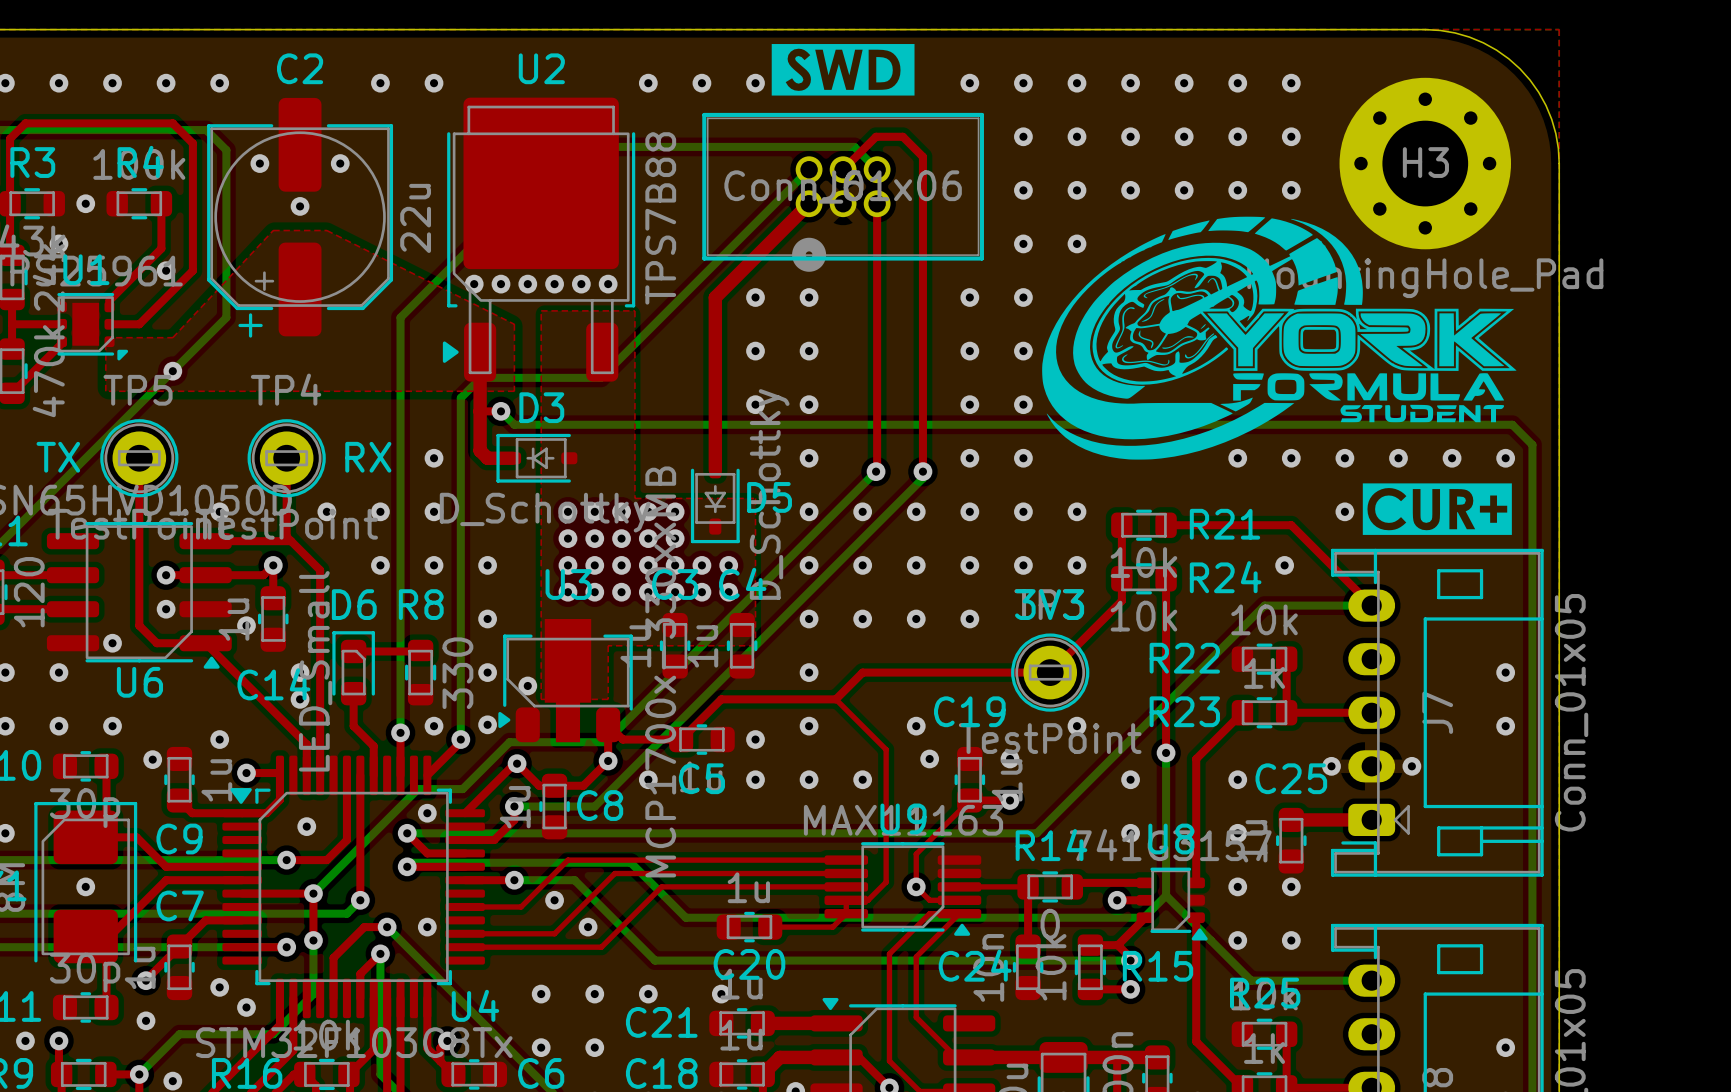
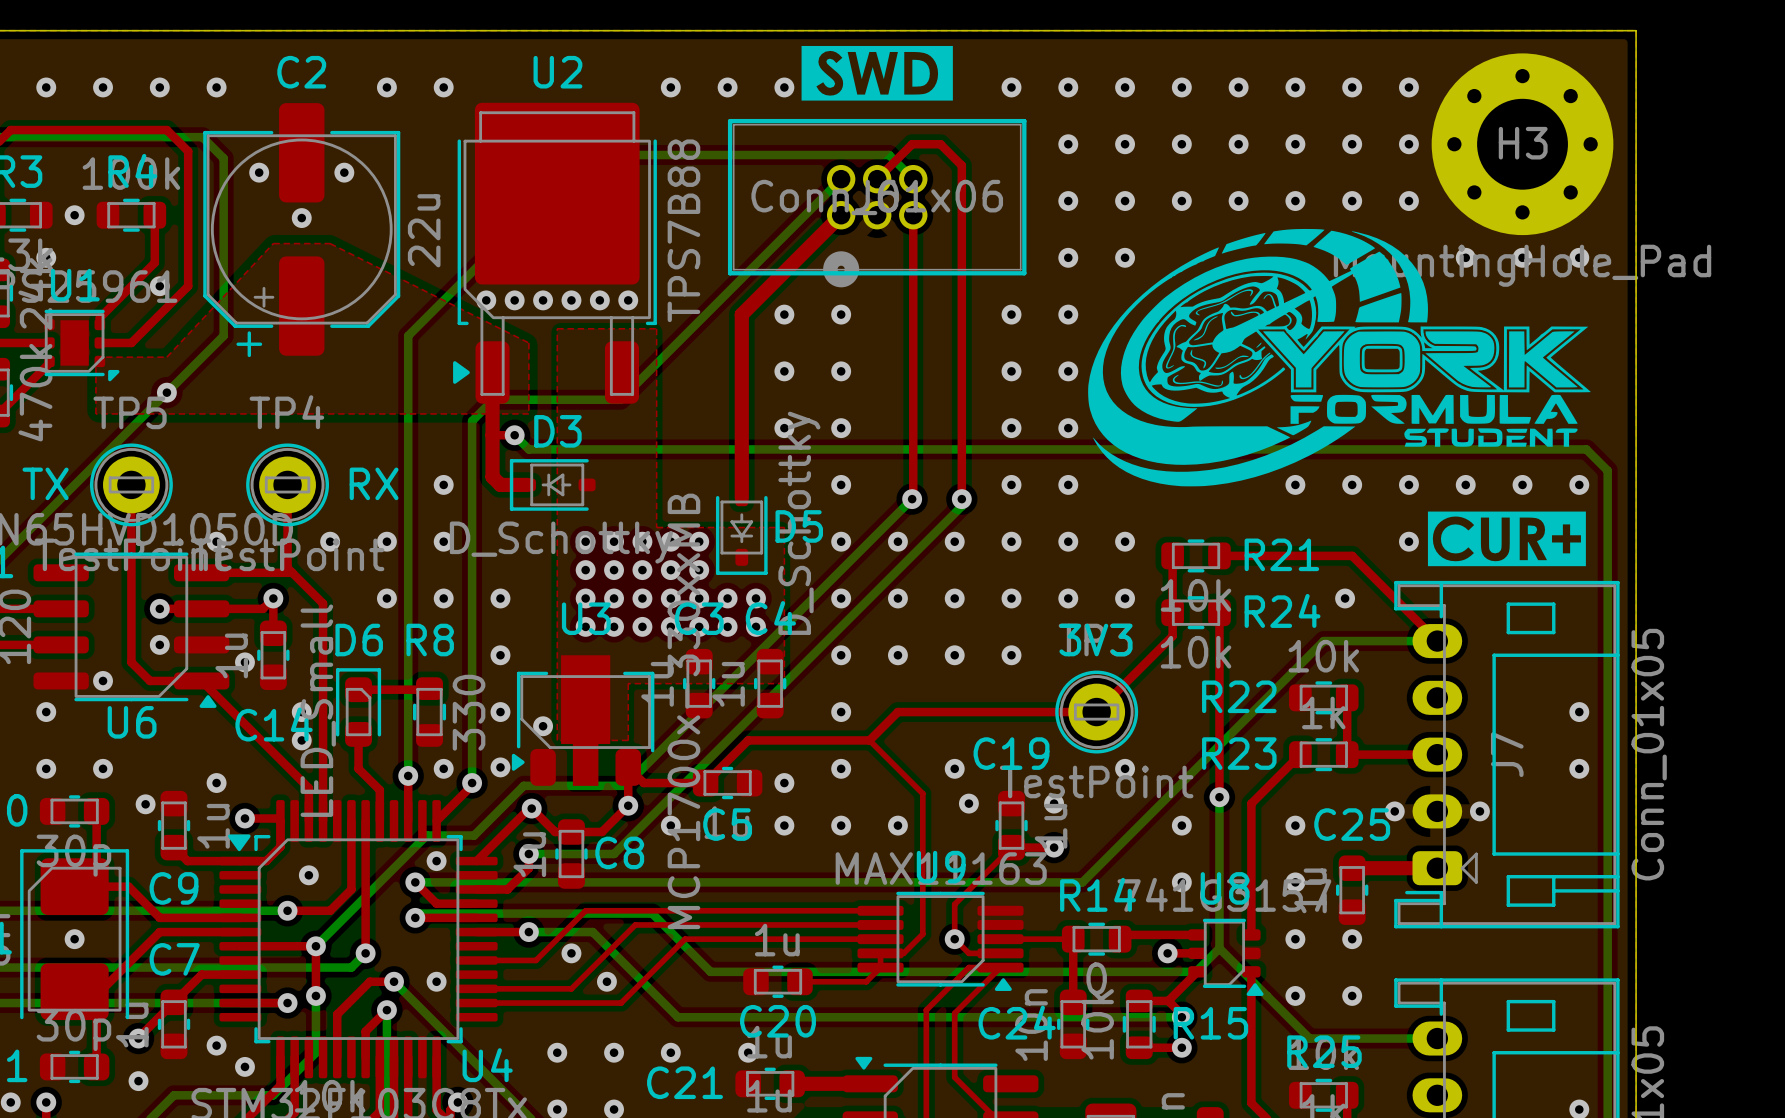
board edge: (1425, 29) (1455, 32) (1483, 42) (1508, 58) (1520, 68) (1538, 92) (1551, 119) (1558, 148) (1559, 163) -> (1494, 30) (1636, 30) (1636, 172)
via: none -> (1408, 87)
via: none -> (1408, 144)
H3 position: (1425, 163) -> (1522, 144)
via: none -> (1408, 201)
via: none -> (1465, 257)
via: none -> (1522, 257)
via: none -> (1579, 257)

